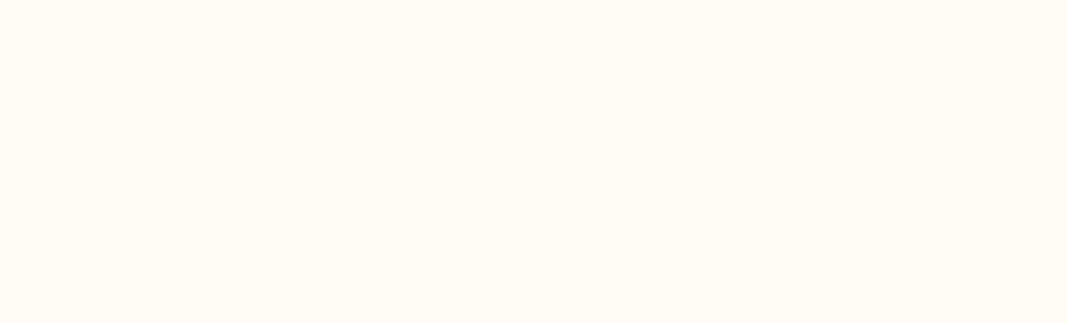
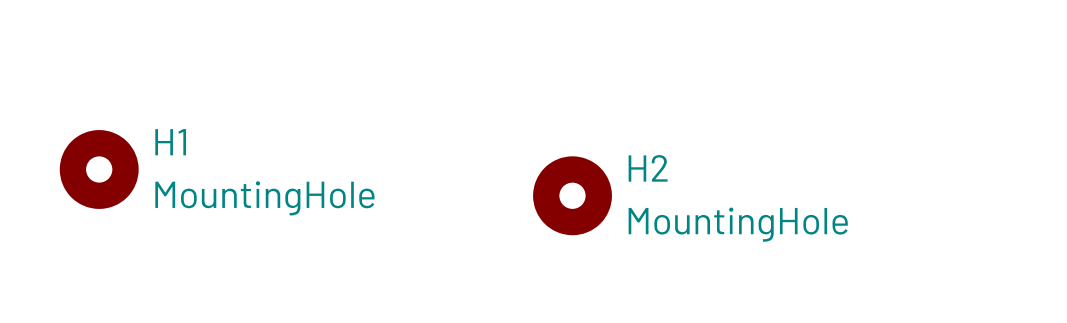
H1: none -> MountingHole (99, 169)
H2: none -> MountingHole (572, 195)

